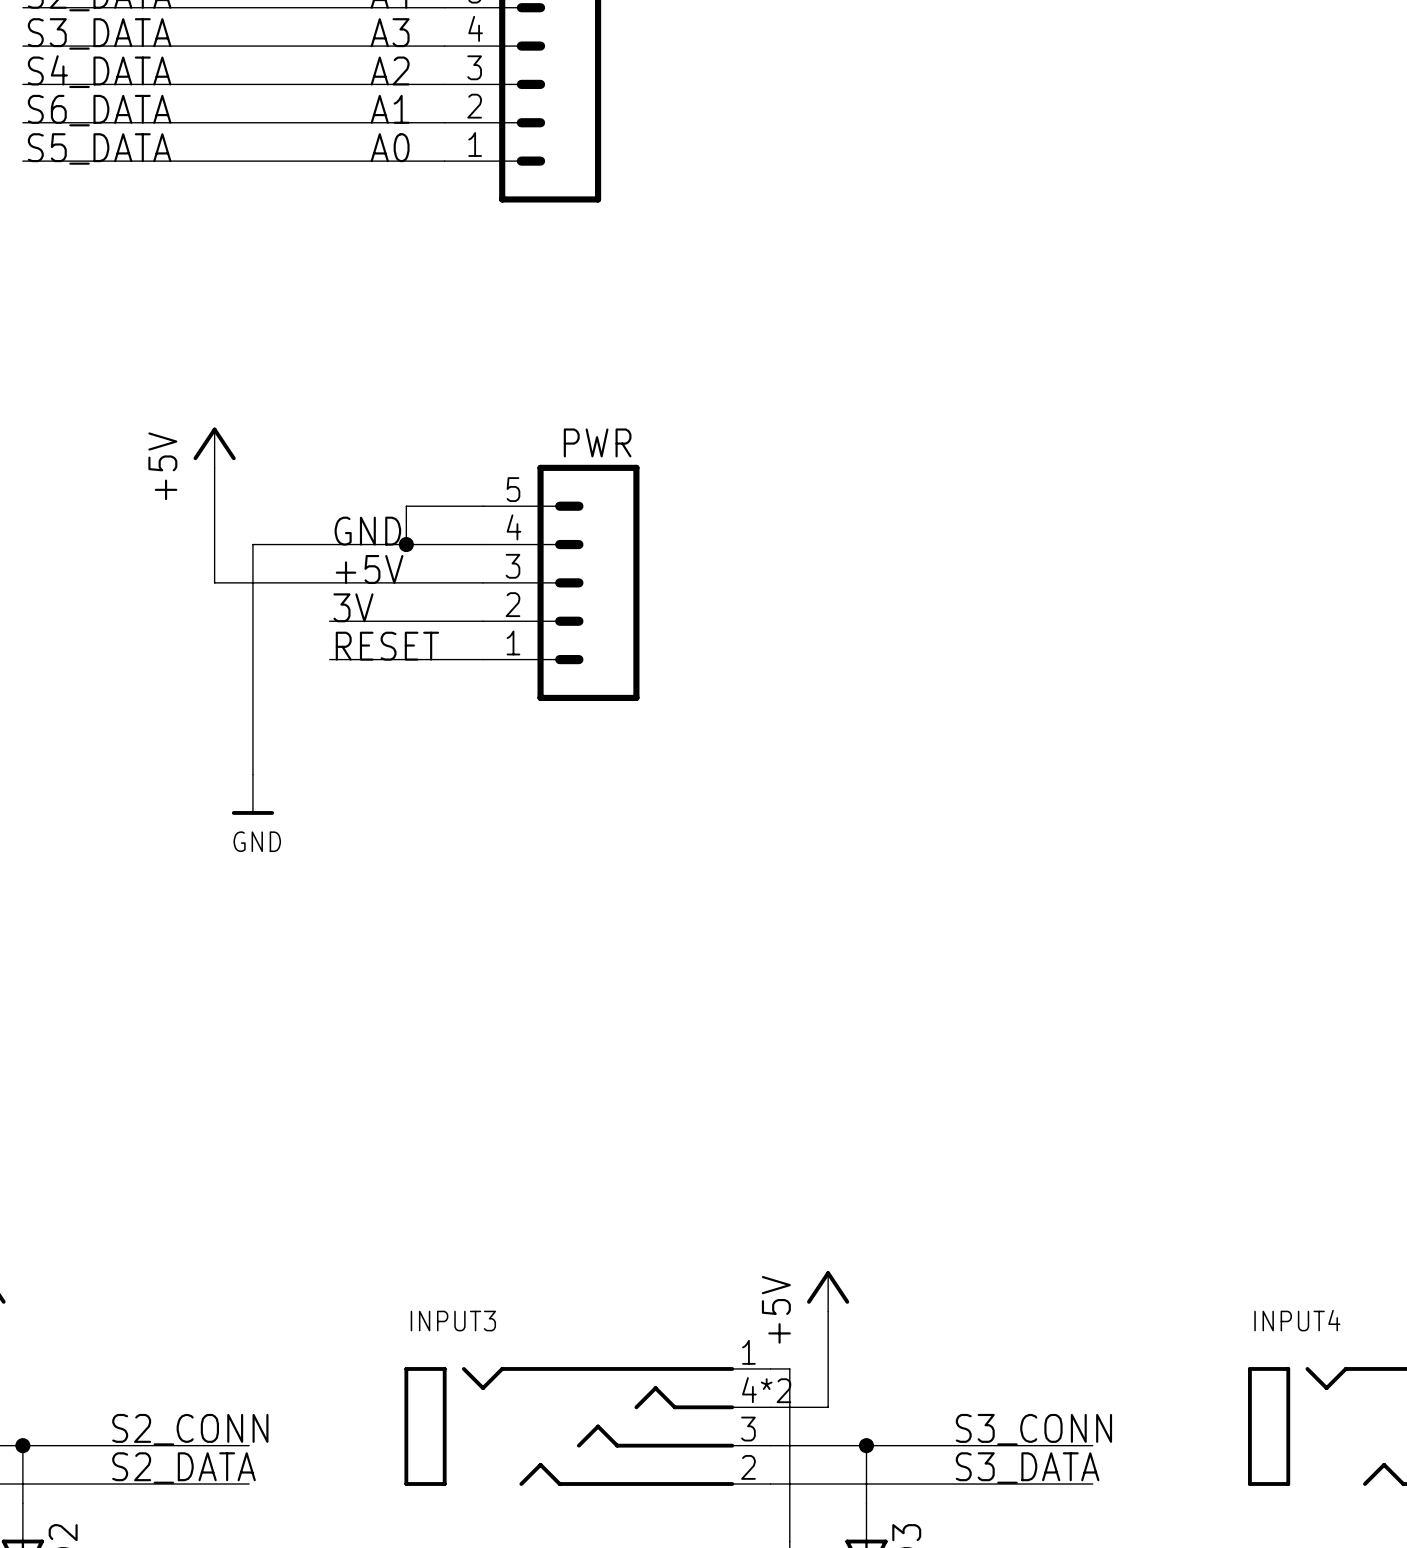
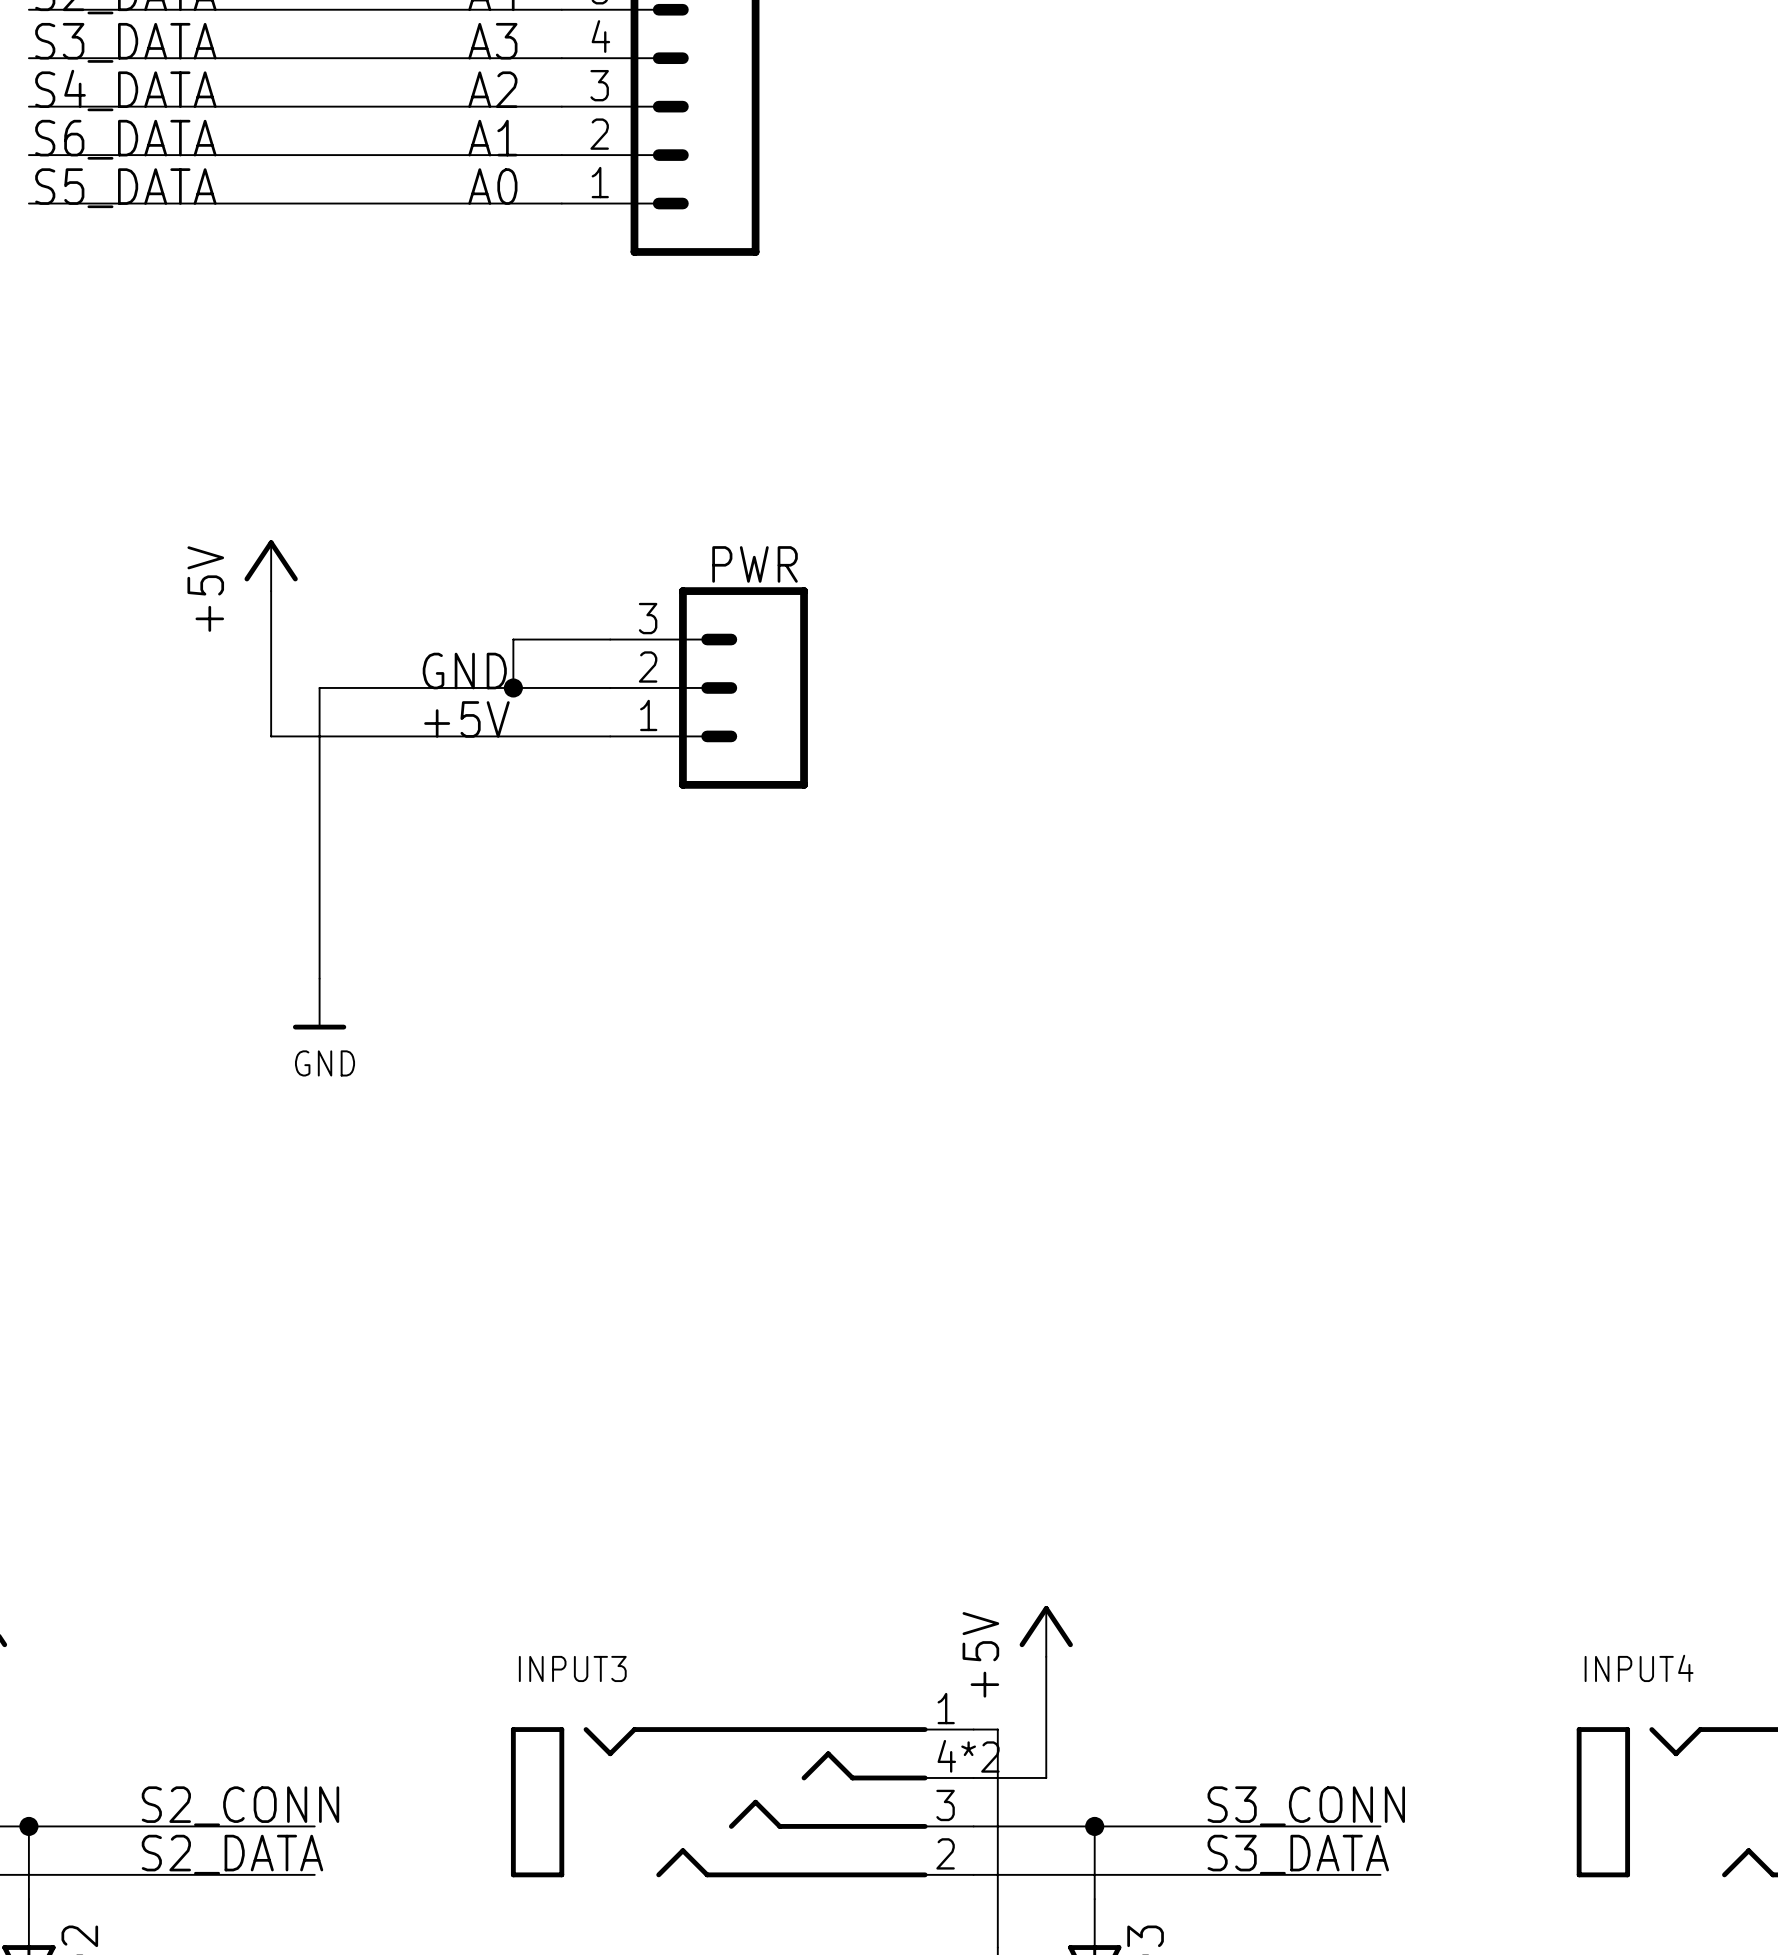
PWR: none -> (709, 687)
PWR: (561, 582) -> none
label: 3V (353, 607) -> none
wire: (329, 621) (483, 621) -> none
label: RESET (387, 646) -> none
wire: (329, 659) (483, 659) -> none

